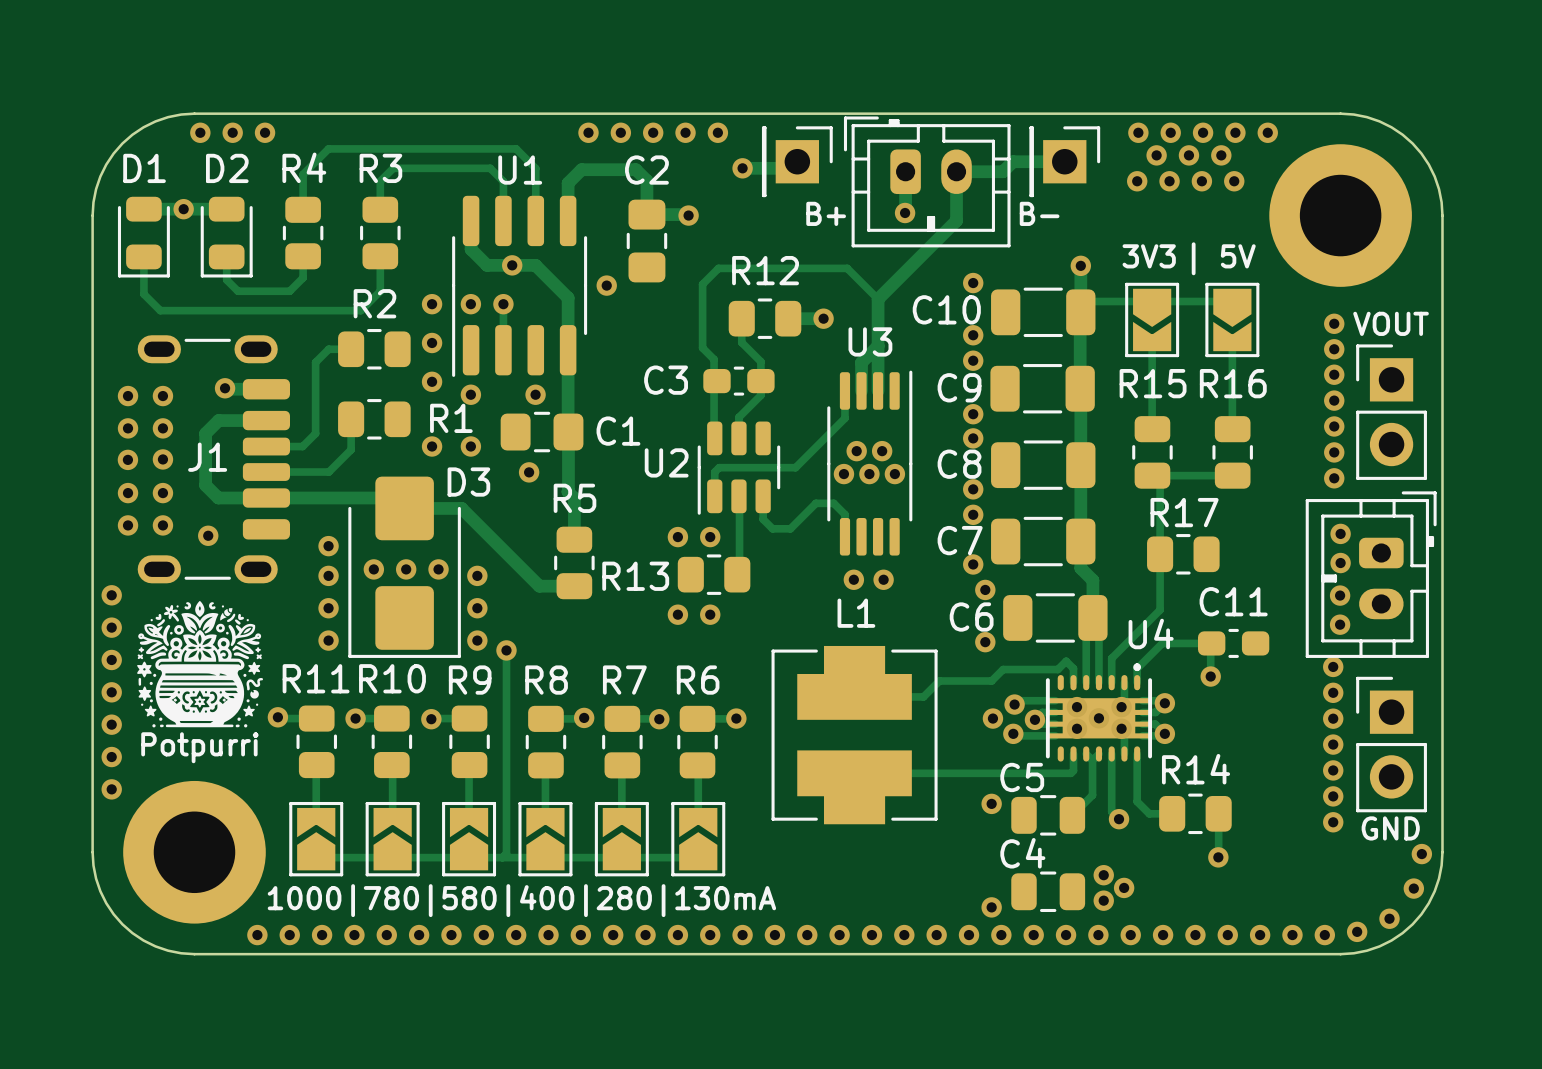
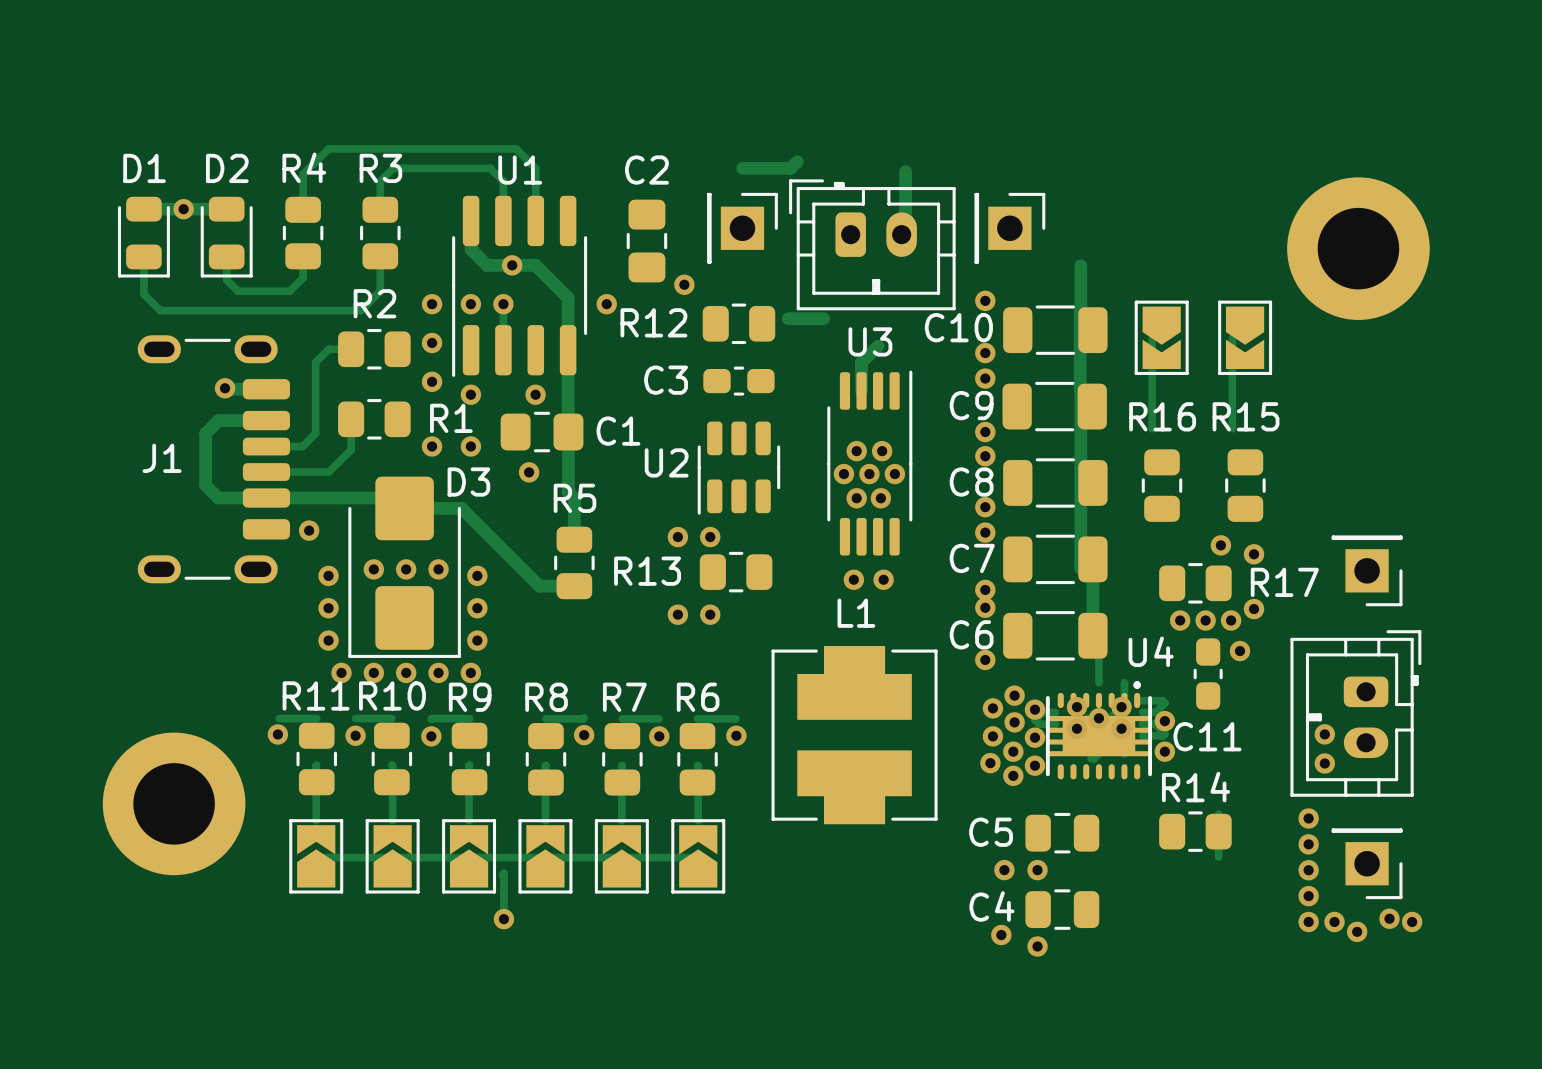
board edge: (194, 113) (1340, 113) (1366, 117) (1391, 127) (1412, 143) (1428, 164) (1439, 189) (1442, 215) (1442, 852) (1439, 878) (1428, 903) (1412, 924) (1391, 940) (1366, 950) (1340, 954) (194, 954) (168, 950) (143, 940) (122, 924) (106, 903) (96, 878) (93, 865) (92, 215) (93, 202) (100, 176) (113, 153) (122, 143) (132, 134) (155, 121) (168, 117) (194, 113) -> none
via: (200, 132) -> none
via: (232, 132) -> none
via: (265, 132) -> none
via: (588, 132) -> none
via: (620, 132) -> none
via: (653, 132) -> none
via: (685, 132) -> none
via: (717, 132) -> none
via: (1138, 132) -> none
via: (1170, 132) -> none
via: (1203, 132) -> none
via: (1235, 132) -> none
via: (1267, 132) -> none
via: (1156, 155) -> none
via: (1188, 155) -> none
via: (1221, 155) -> none
part position: (797, 161) -> (742, 228)
track: (1064, 161) (1013, 161) (1003, 171) (956, 171) (956, 220) (878, 299) -> none
part position: (1064, 161) -> (1009, 228)
via: (742, 168) -> none
part position: (927, 181) -> (872, 244)
via: (1137, 181) -> none
via: (1169, 181) -> none
via: (1201, 181) -> none
via: (1234, 181) -> none
text: B+ (826, 213) -> none
via: (905, 213) -> none
text: B- (1039, 213) -> none
track: (688, 215) (646, 214) (646, 180) (635, 169) (581, 169) (568, 183) (568, 220) -> none
via: (688, 215) -> none
part position: (1340, 215) -> (1358, 248)
text: 3V3 (1149, 256) -> none
text: | 5V (1223, 258) -> none
via: (1080, 265) -> none
R12 name position: R12 (765, 270) -> R12 (653, 322)
via position: (973, 283) -> (985, 300)
via: none -> (684, 284)
via position: (606, 285) -> (606, 304)
track: (878, 299) (878, 390) -> none
track: (878, 299) (847, 268) (718, 268) (702, 284) (702, 347) (714, 359) (714, 378) (716, 381) (714, 384) (714, 438) -> none
track: (1232, 301) (1091, 301) (1080, 312) -> none
C10 position: (1043, 312) -> (1055, 330)
track: (741, 318) (741, 342) (760, 361) (760, 395) (738, 417) (738, 438) -> none
R12 position: (765, 318) -> (738, 323)
via: (823, 318) -> none
part position: (1152, 319) -> (1161, 337)
part position: (1232, 319) -> (1245, 337)
via: (1334, 323) -> none
text: VOUT (1391, 323) -> none
via: (973, 335) -> none
via: (1334, 349) -> none
via: none -> (985, 353)
via: (973, 360) -> none
via: (1334, 374) -> none
via: none -> (985, 378)
C9 position: (1042, 388) -> (1054, 406)
track: (844, 390) (844, 418) (795, 467) (719, 467) (714, 472) (714, 496) -> none
via: (128, 396) -> none
via: (162, 396) -> none
via: (1334, 400) -> none
part: (1391, 412) -> none
via: (973, 414) -> none
via: (1334, 426) -> none
via: (128, 428) -> none
via: (162, 428) -> none
via: none -> (985, 432)
via: (973, 438) -> none
R15 position: (1152, 452) -> (1245, 485)
R16 position: (1232, 452) -> (1162, 485)
via: (1334, 452) -> none
via: none -> (985, 456)
J1 name position: J1 (207, 457) -> J1 (162, 458)
via: (127, 459) -> none
via: (162, 459) -> none
C8 position: (1043, 465) -> (1055, 482)
track: (1232, 475) (1152, 475) (1160, 483) (1160, 610) (1111, 658) (1111, 682) -> none
via: (1334, 478) -> none
via: (973, 489) -> none
part footprint: [1305, 491, 1437, 658] -> [1331, 535, 1403, 607]
via: (128, 493) -> none
via: (162, 493) -> none
track: (738, 496) (739, 572) (737, 574) -> none
track: (763, 496) (763, 519) (772, 528) (790, 528) (815, 503) (833, 503) (844, 514) (844, 536) -> none
via: none -> (856, 498)
via: none -> (880, 498)
via: none -> (985, 507)
R17 name position: R17 (1184, 512) -> R17 (1284, 582)
via: (973, 514) -> none
via: (128, 525) -> none
via: (162, 525) -> none
via: none -> (985, 532)
via: (1340, 533) -> none
via: (208, 535) -> none
C7 position: (1043, 541) -> (1055, 559)
via: none -> (1220, 545)
via position: (328, 546) -> (309, 530)
R17 position: (1183, 554) -> (1195, 583)
via: none -> (1254, 554)
via: (1340, 563) -> none
via: (973, 564) -> none
R13 position: (714, 574) -> (736, 572)
R13 name position: R13 (635, 576) -> R13 (647, 571)
via: (111, 595) -> none
via: (1340, 595) -> none
drawing: [137, 601, 263, 728] -> none
C11 name position: C11 (1233, 601) -> C11 (1207, 736)
via: none -> (985, 607)
via: none -> (1254, 609)
C6 position: (1055, 617) -> (1055, 635)
track: (1092, 617) (1086, 624) (1086, 682) -> none
via: none -> (1180, 620)
via: none -> (1205, 620)
via: none -> (1231, 620)
via: (1340, 624) -> none
via: (111, 627) -> none
via position: (985, 642) -> (985, 659)
C11 rotation: 0° (1233, 643) -> 90° clockwise (1208, 673)
track: (506, 650) (506, 853) (502, 857) -> none
via: (506, 650) -> none
via: none -> (1240, 651)
via: (111, 659) -> none
via: (1333, 666) -> none
via: none -> (341, 672)
via: none -> (373, 672)
via: none -> (406, 672)
via: none -> (438, 672)
via: none -> (470, 672)
track: (1210, 676) (1211, 643) (1162, 643) (1137, 668) (1137, 682) -> none
via: (1210, 676) -> none
track: (1073, 682) (1073, 668) (1066, 661) (1057, 669) (1003, 669) (991, 680) (939, 680) (923, 696) (854, 696) -> none
via: (111, 692) -> none
via: (1333, 692) -> none
via: none -> (1014, 695)
track: (1055, 700) (1018, 700) (1014, 704) -> none
via: (1164, 703) -> none
via: (1014, 704) -> none
via: none -> (992, 708)
via: none -> (1034, 709)
U4 position: (1098, 712) -> (1098, 730)
part: none -> (1355, 713)
via position: (277, 717) -> (277, 734)
via position: (584, 717) -> (584, 735)
via position: (355, 718) -> (355, 735)
via position: (736, 718) -> (736, 735)
via: (992, 718) -> none
via: (1333, 718) -> none
via position: (431, 719) -> (431, 736)
via position: (659, 719) -> (659, 736)
via: (1034, 719) -> none
via: none -> (1164, 721)
via: none -> (1014, 722)
via: (111, 724) -> none
track: (1013, 733) (1015, 735) (1055, 735) -> none
via: (1013, 733) -> none
via: (1164, 733) -> none
via: none -> (1324, 734)
via: none -> (992, 736)
via: none -> (1034, 737)
R11 position: (316, 741) -> (316, 758)
R10 position: (391, 741) -> (391, 758)
R9 position: (469, 741) -> (469, 758)
R8 position: (545, 742) -> (545, 759)
R7 position: (622, 742) -> (622, 759)
R6 position: (697, 742) -> (697, 759)
via: (1333, 744) -> none
part: (1391, 744) -> none
text: Potpurri (199, 747) -> none
via: none -> (1013, 751)
via: none -> (1164, 751)
track: (1073, 753) (1073, 770) (1070, 773) (854, 773) -> none
track: (1086, 753) (1092, 760) (1092, 795) (1072, 815) -> none
track: (1111, 753) (1111, 811) (1119, 819) -> none
track: (1137, 753) (1137, 801) (1149, 813) (1172, 813) -> none
via: (111, 757) -> none
via: none -> (990, 763)
via: none -> (1324, 763)
via: none -> (1034, 765)
via: (1333, 770) -> none
via: none -> (1013, 775)
C5 name position: C5 (1022, 777) -> C5 (991, 832)
via: (111, 789) -> none
via: (1333, 796) -> none
via: (991, 803) -> none
R14 position: (1195, 813) -> (1195, 831)
C5 position: (1048, 815) -> (1062, 833)
via: none -> (1308, 818)
via: (1119, 819) -> none
via: (1333, 822) -> none
text: GND (1390, 828) -> none
part position: (316, 839) -> (316, 856)
part position: (392, 839) -> (392, 856)
part position: (469, 839) -> (469, 856)
part position: (545, 839) -> (545, 856)
part position: (621, 839) -> (621, 856)
part position: (698, 839) -> (698, 856)
via: none -> (1308, 844)
part position: (194, 852) -> (174, 803)
C4 name position: C4 (1022, 853) -> C4 (991, 906)
via: (1421, 854) -> none
via: (1218, 857) -> none
part: none -> (1367, 863)
via: none -> (1004, 870)
via: none -> (1037, 870)
via: none -> (1308, 870)
track: none -> (502, 874) (503, 873) (503, 919)
via: (1103, 875) -> none
via: (1124, 887) -> none
via position: (1413, 888) -> (1412, 921)
C4 position: (1048, 891) -> (1062, 909)
via: none -> (1308, 896)
text: 1000|780|580|400|280|130mA (521, 900) -> none
via: (1103, 900) -> none
via: (991, 907) -> none
via: none -> (503, 919)
via: none -> (1308, 921)
via: none -> (1334, 921)
via: (257, 935) -> none
via: (289, 935) -> none
via: (322, 935) -> none
via: (354, 935) -> none
via: (386, 935) -> none
via: (419, 935) -> none
via: (451, 935) -> none
via: (483, 935) -> none
via: (516, 935) -> none
via: (548, 935) -> none
via: (580, 935) -> none
via: (613, 935) -> none
via: (645, 935) -> none
via: (677, 935) -> none
via: (710, 935) -> none
via: (742, 935) -> none
via: (774, 935) -> none
via: (807, 935) -> none
via: (839, 935) -> none
via: (871, 935) -> none
via: (904, 935) -> none
via: (936, 935) -> none
via: (969, 935) -> none
via position: (1033, 935) -> (1037, 946)
via: (1066, 935) -> none
via: (1098, 935) -> none
via: (1130, 935) -> none
via: (1163, 935) -> none
via: (1195, 935) -> none
via: (1227, 935) -> none
via: (1260, 935) -> none
via: (1292, 935) -> none
via: (1324, 935) -> none

